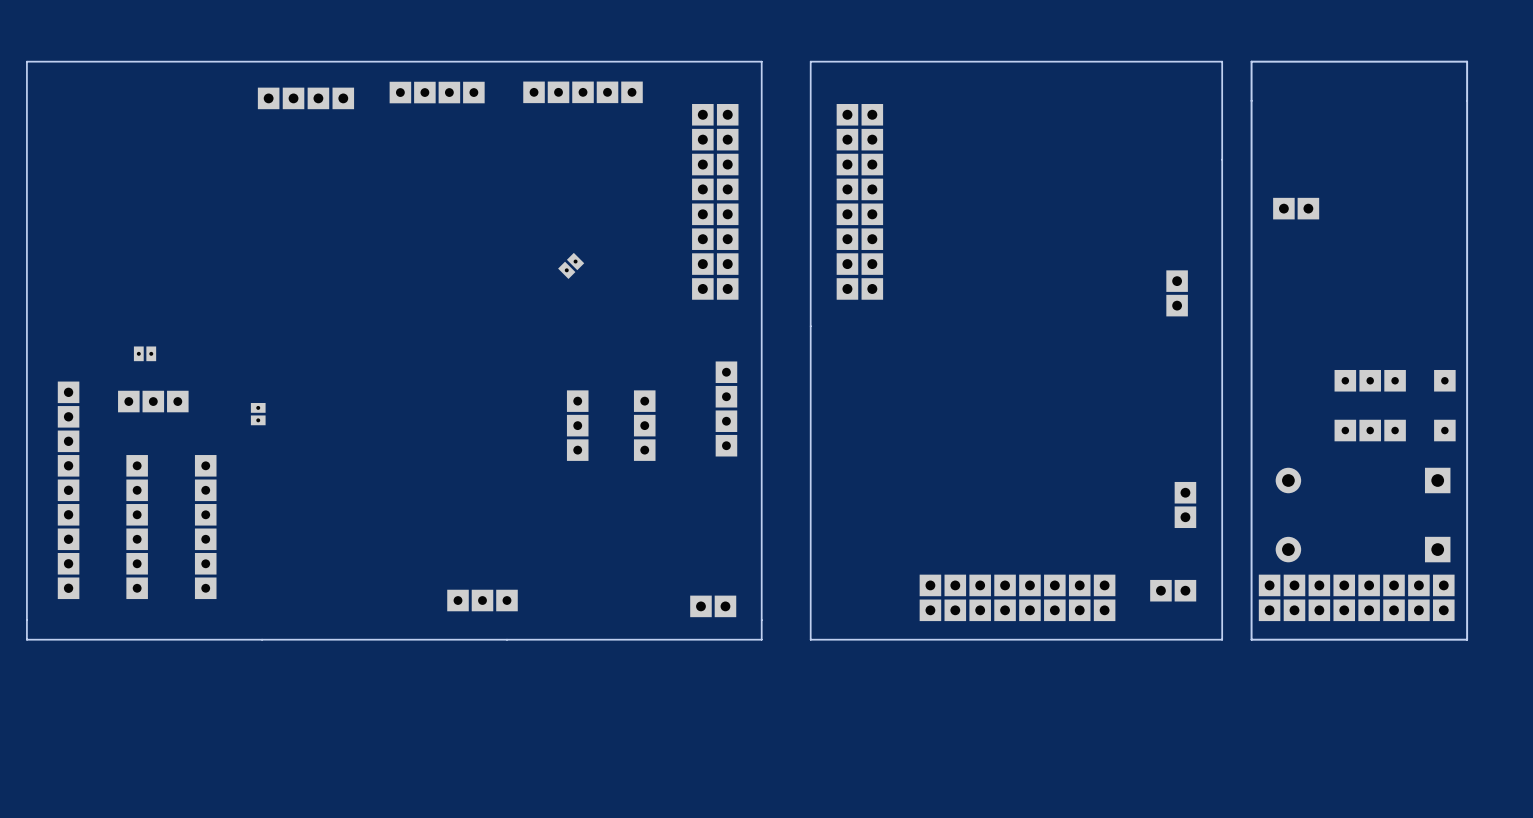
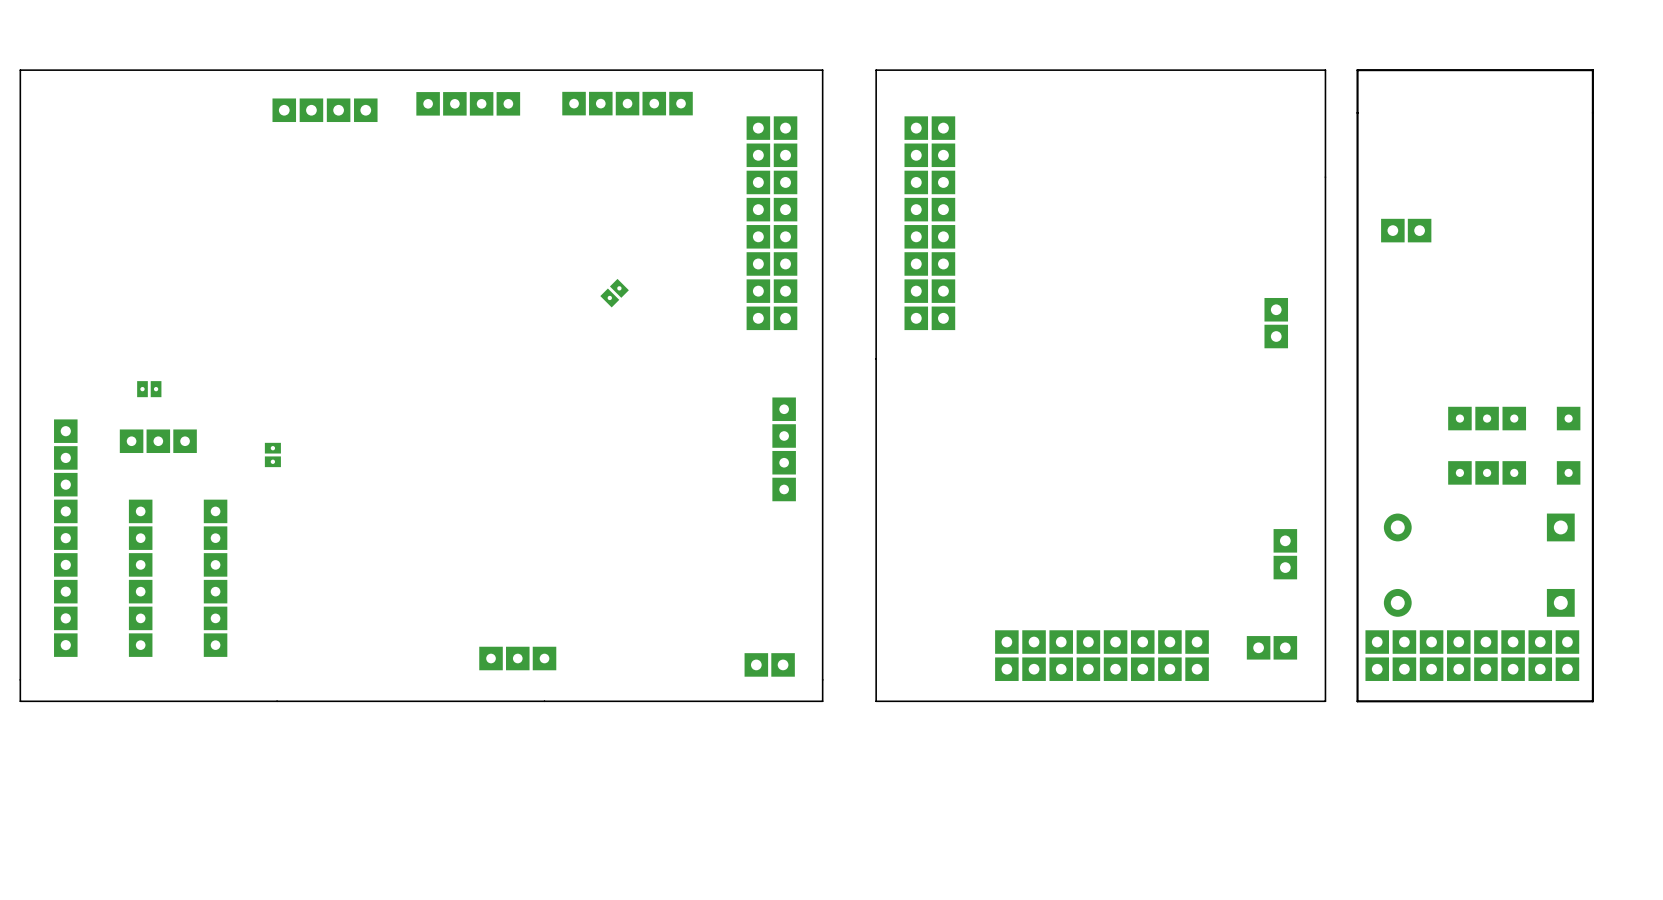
part: (577, 425) -> none
part: (644, 425) -> none

